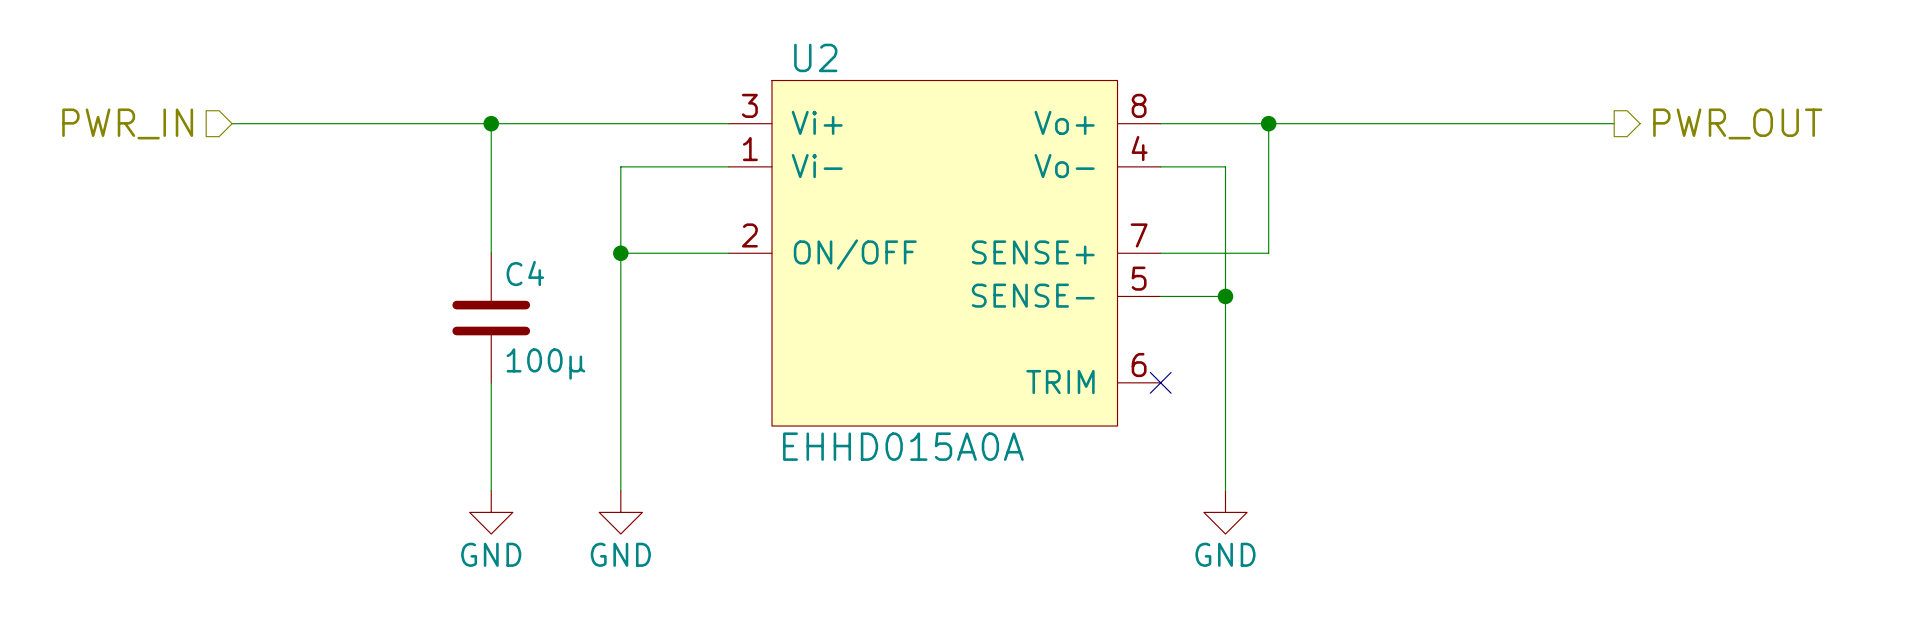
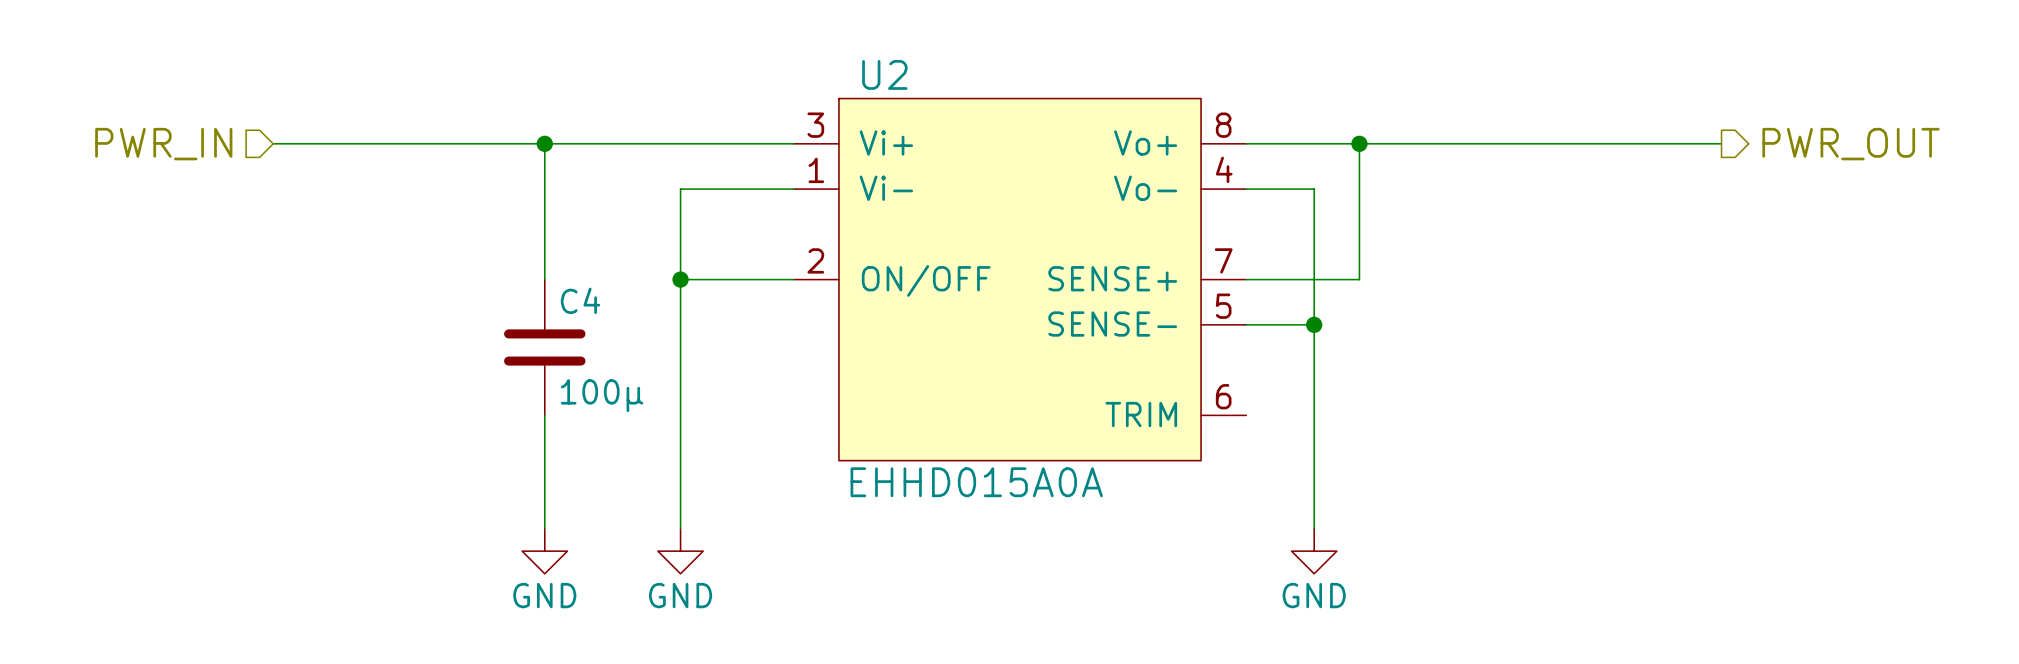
no-connect mark: (1160, 382) -> none

